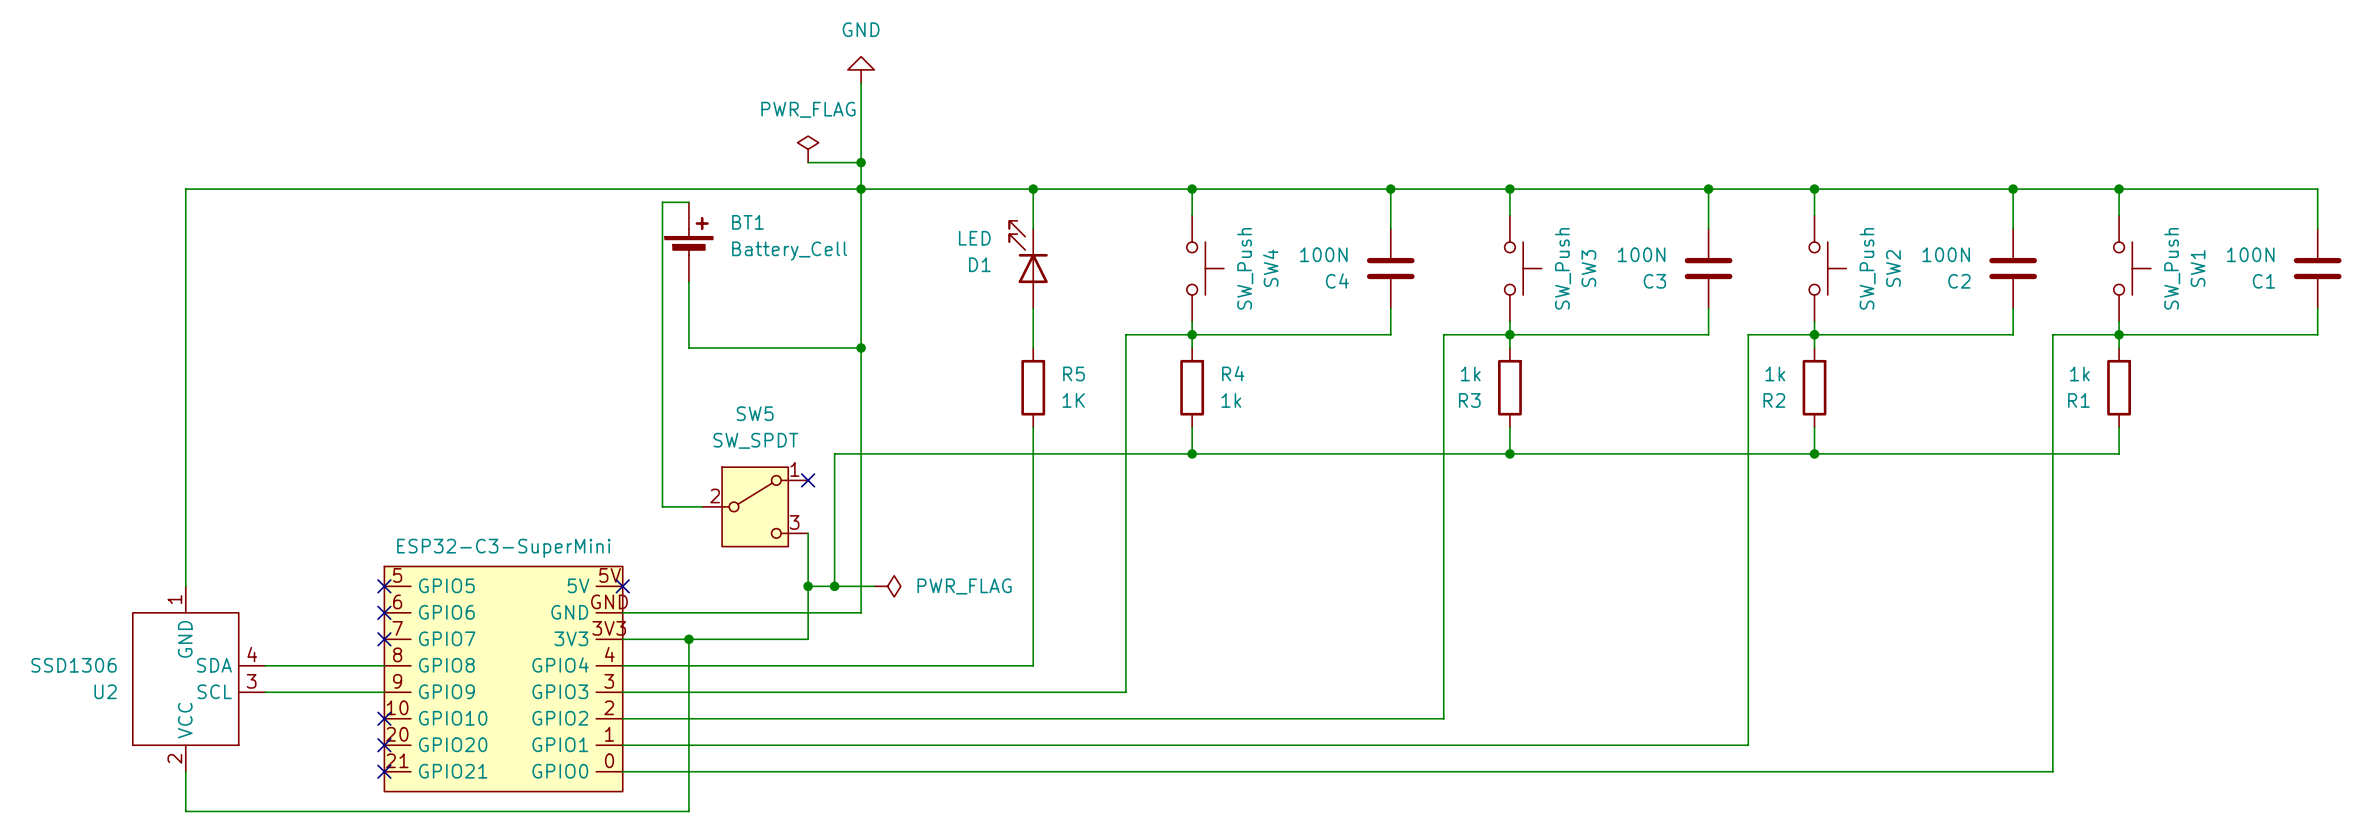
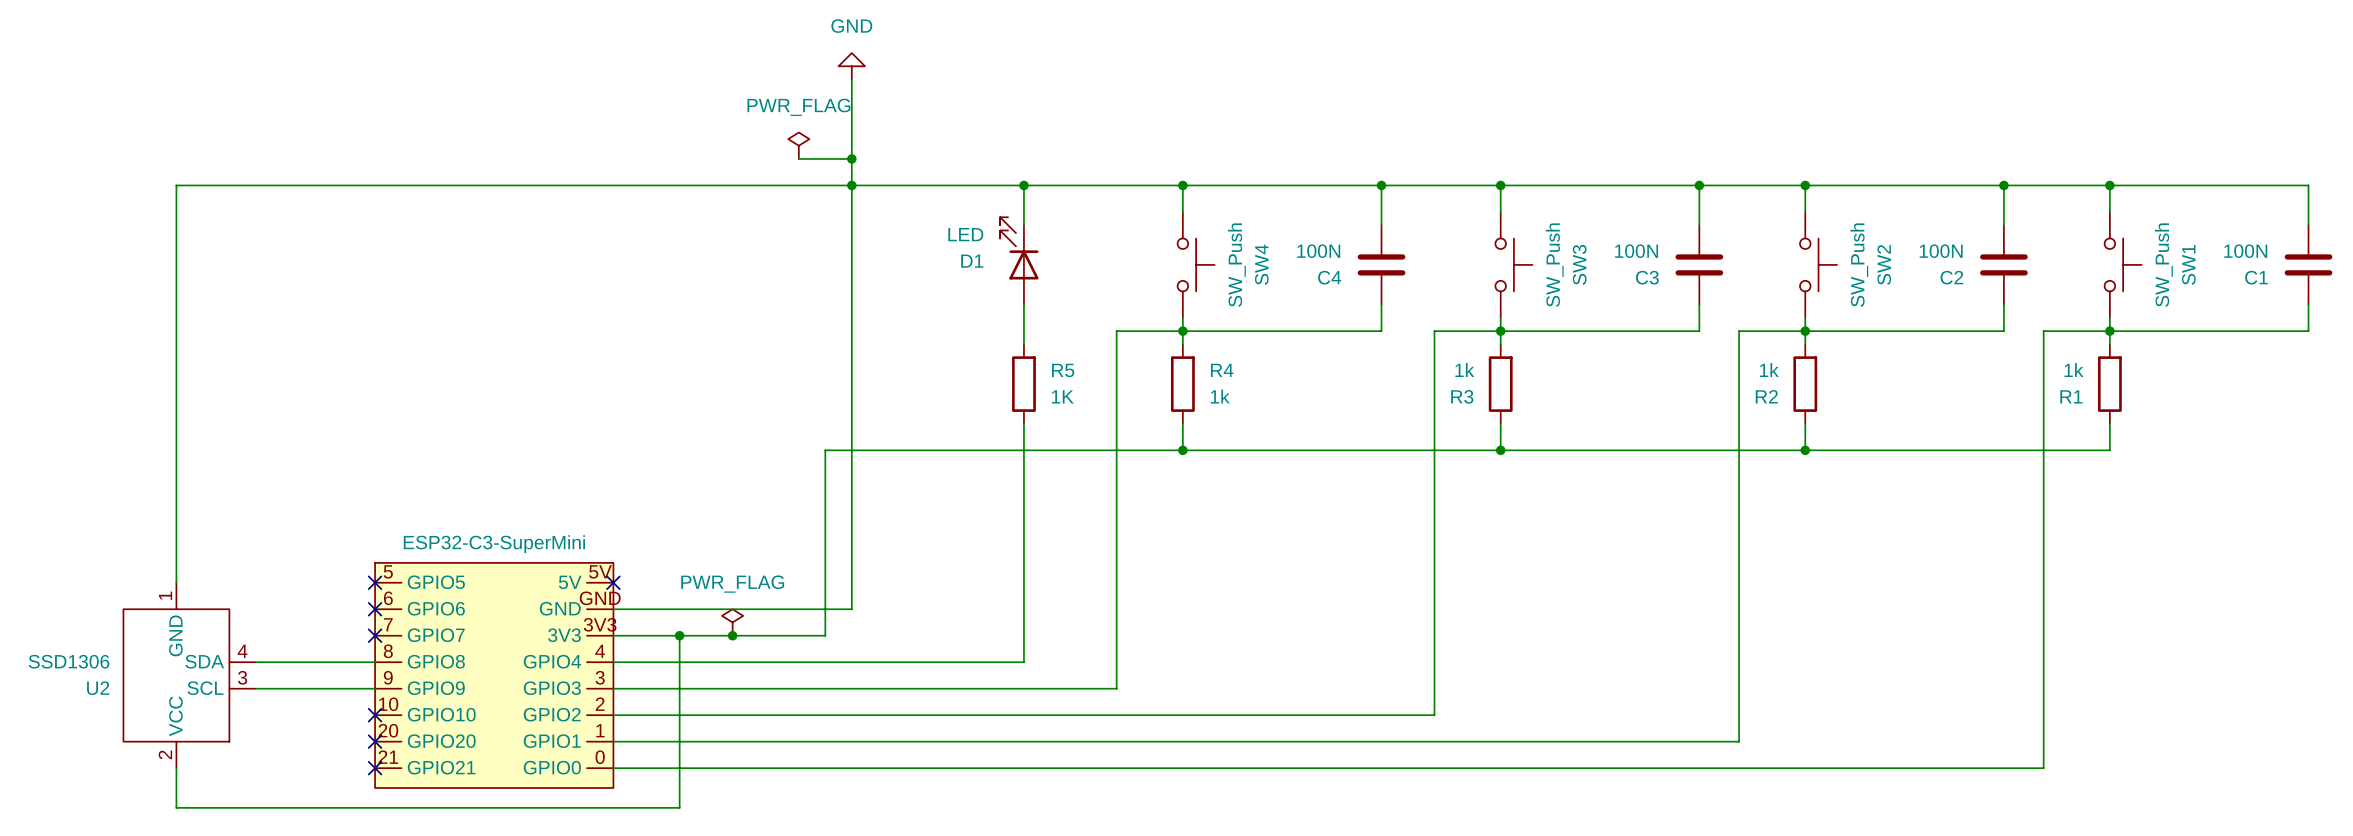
wire: (688, 202) (662, 202) (662, 506) (702, 506) -> none
BT1: Battery_Cell (688, 242) -> none
wire: (688, 281) (688, 347) (861, 347) -> none
junction: (861, 347) -> none
no-connect mark: (808, 480) -> none
SW5: SW_SPDT (755, 506) -> none
wire: (808, 533) (808, 639) -> (825, 582) (825, 635) (798, 635)
wire: (808, 586) (874, 586) -> none
junction: (808, 586) -> none
junction: (834, 586) -> none
power symbol rotation: 0° (887, 586) -> 90° counterclockwise (732, 622)
power symbol position: PWR_FLAG (887, 586) -> PWR_FLAG (732, 622)
power symbol text position: PWR_FLAG (964, 586) -> PWR_FLAG (732, 584)
junction: none -> (732, 635)

